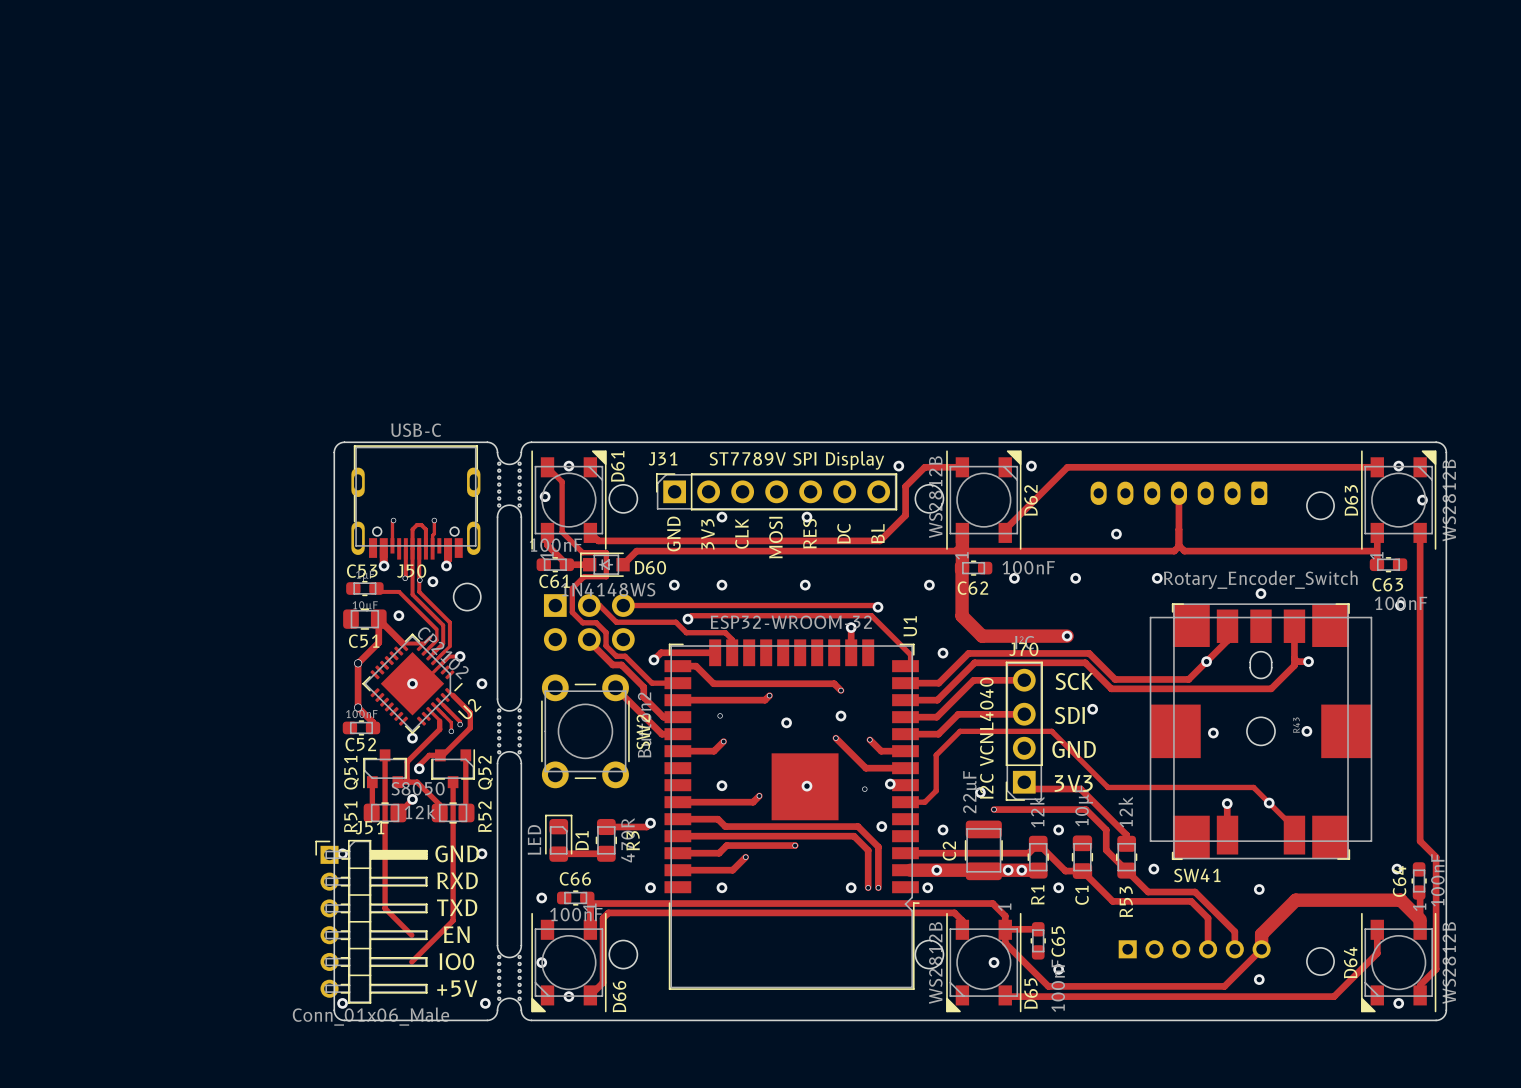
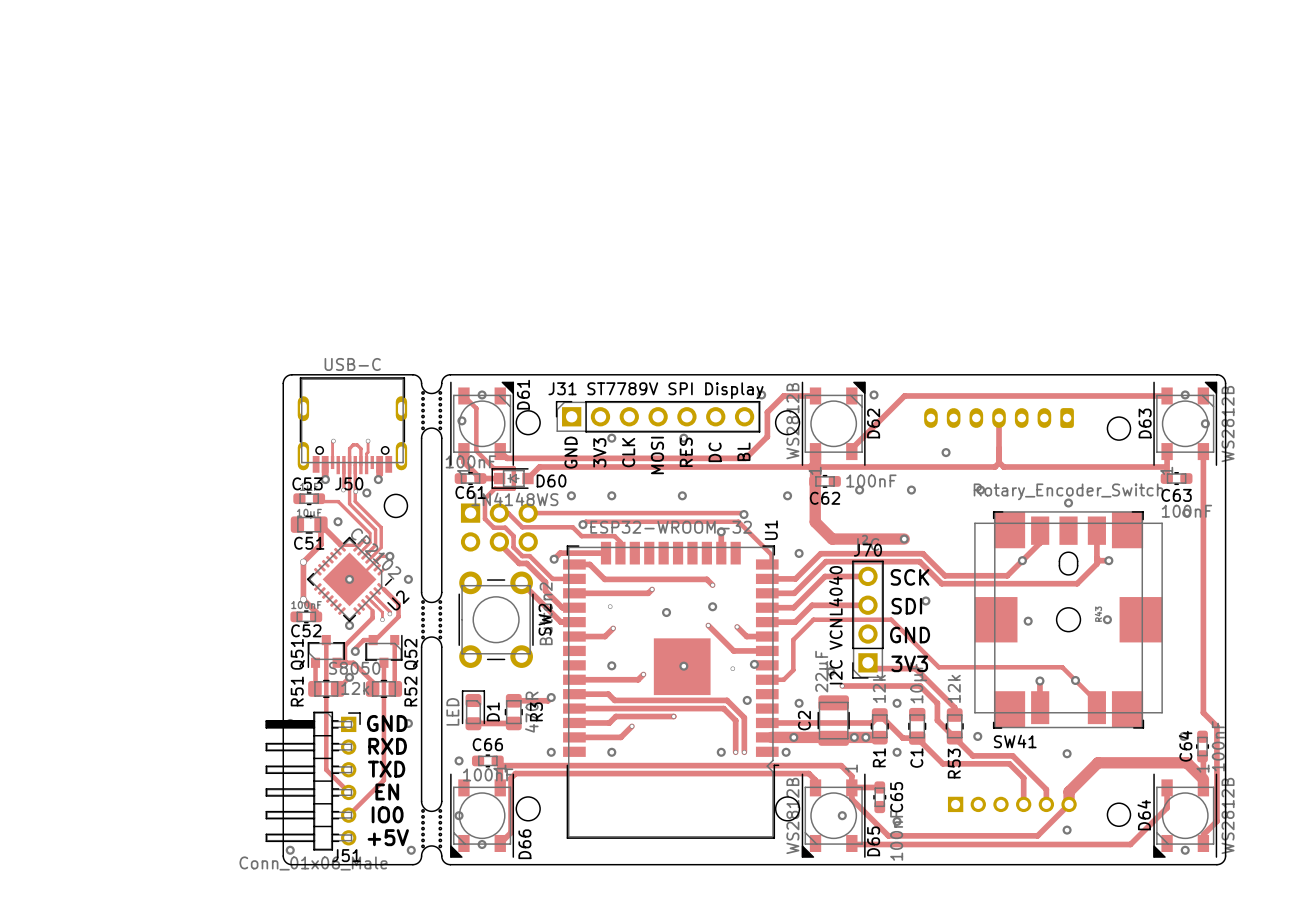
J51 name position: J51 (369, 827) -> J51 (346, 855)
J51 footprint: [315, 839, 428, 1004] -> [265, 711, 361, 851]

